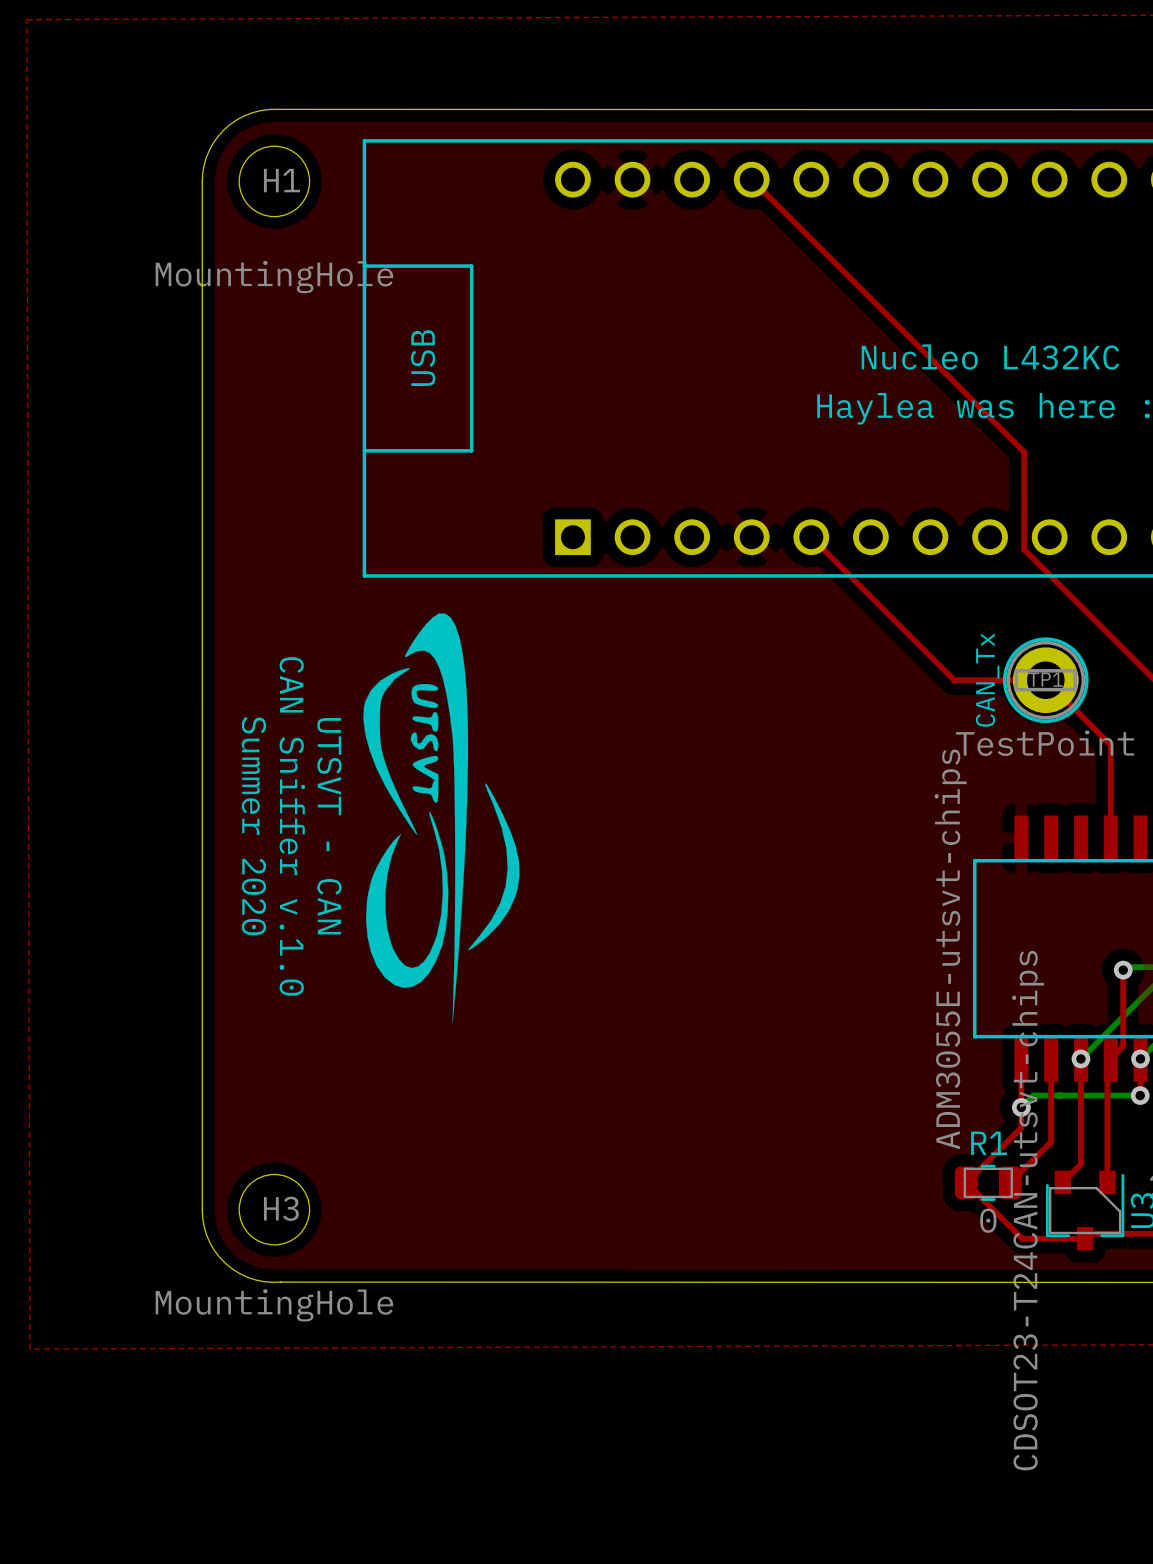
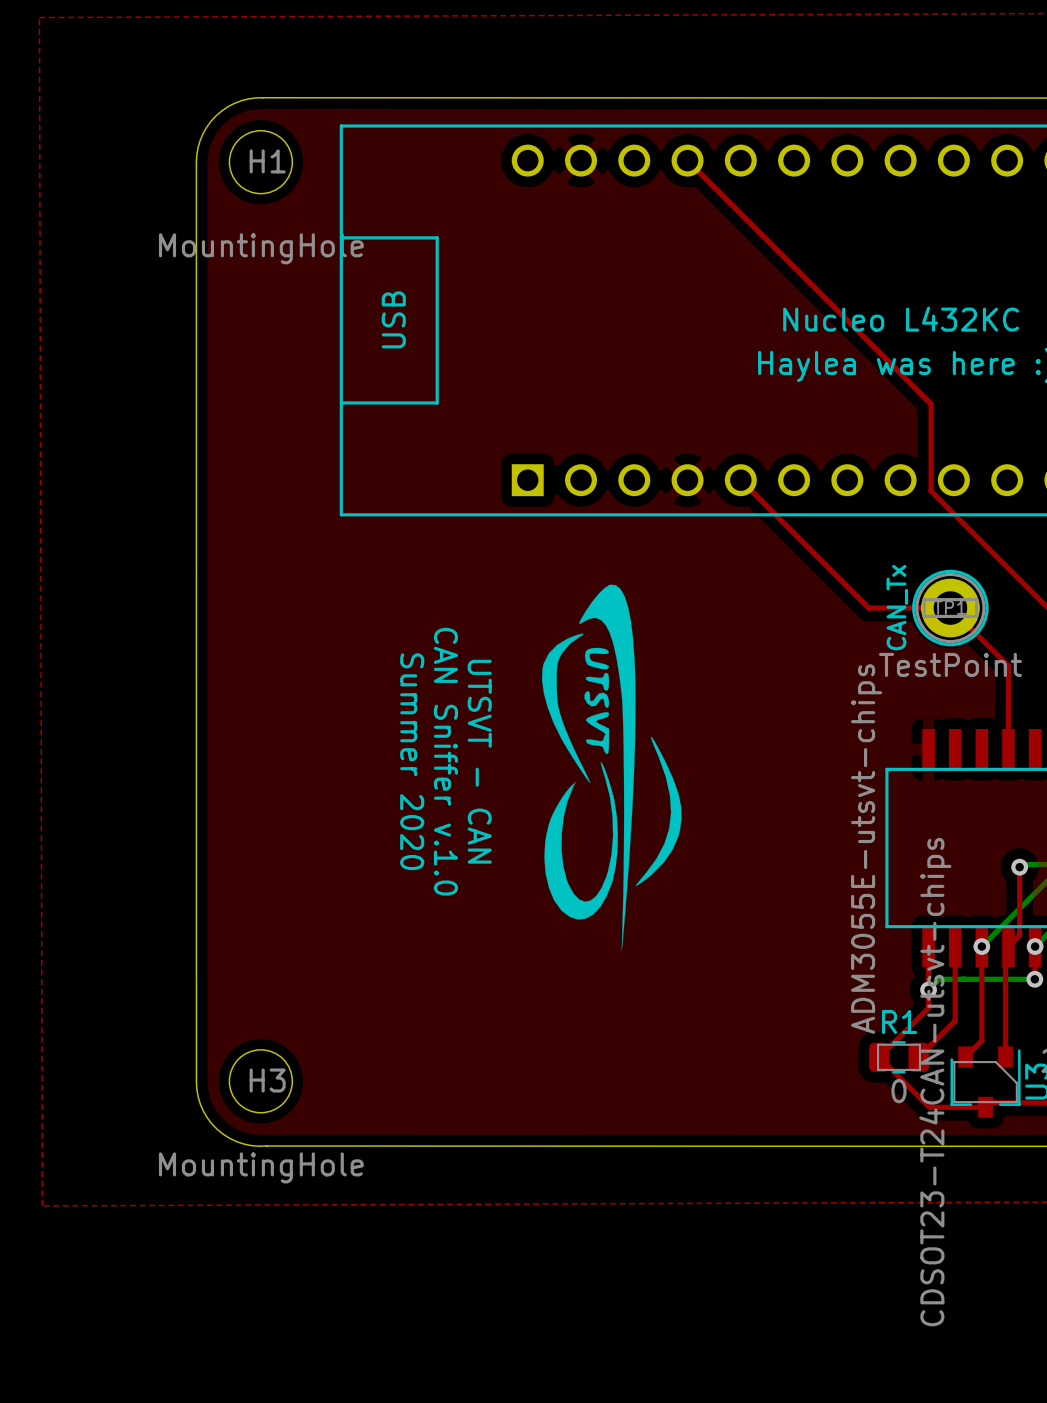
drawing position: (441, 818) -> (611, 767)
text position: Summer 2020 (253, 826) -> Summer 2020 (412, 761)
text position: CAN Sniffer v.1.0 (292, 826) -> CAN Sniffer v.1.0 (445, 761)
text position: UTSVT - CAN (329, 826) -> UTSVT - CAN (479, 761)

